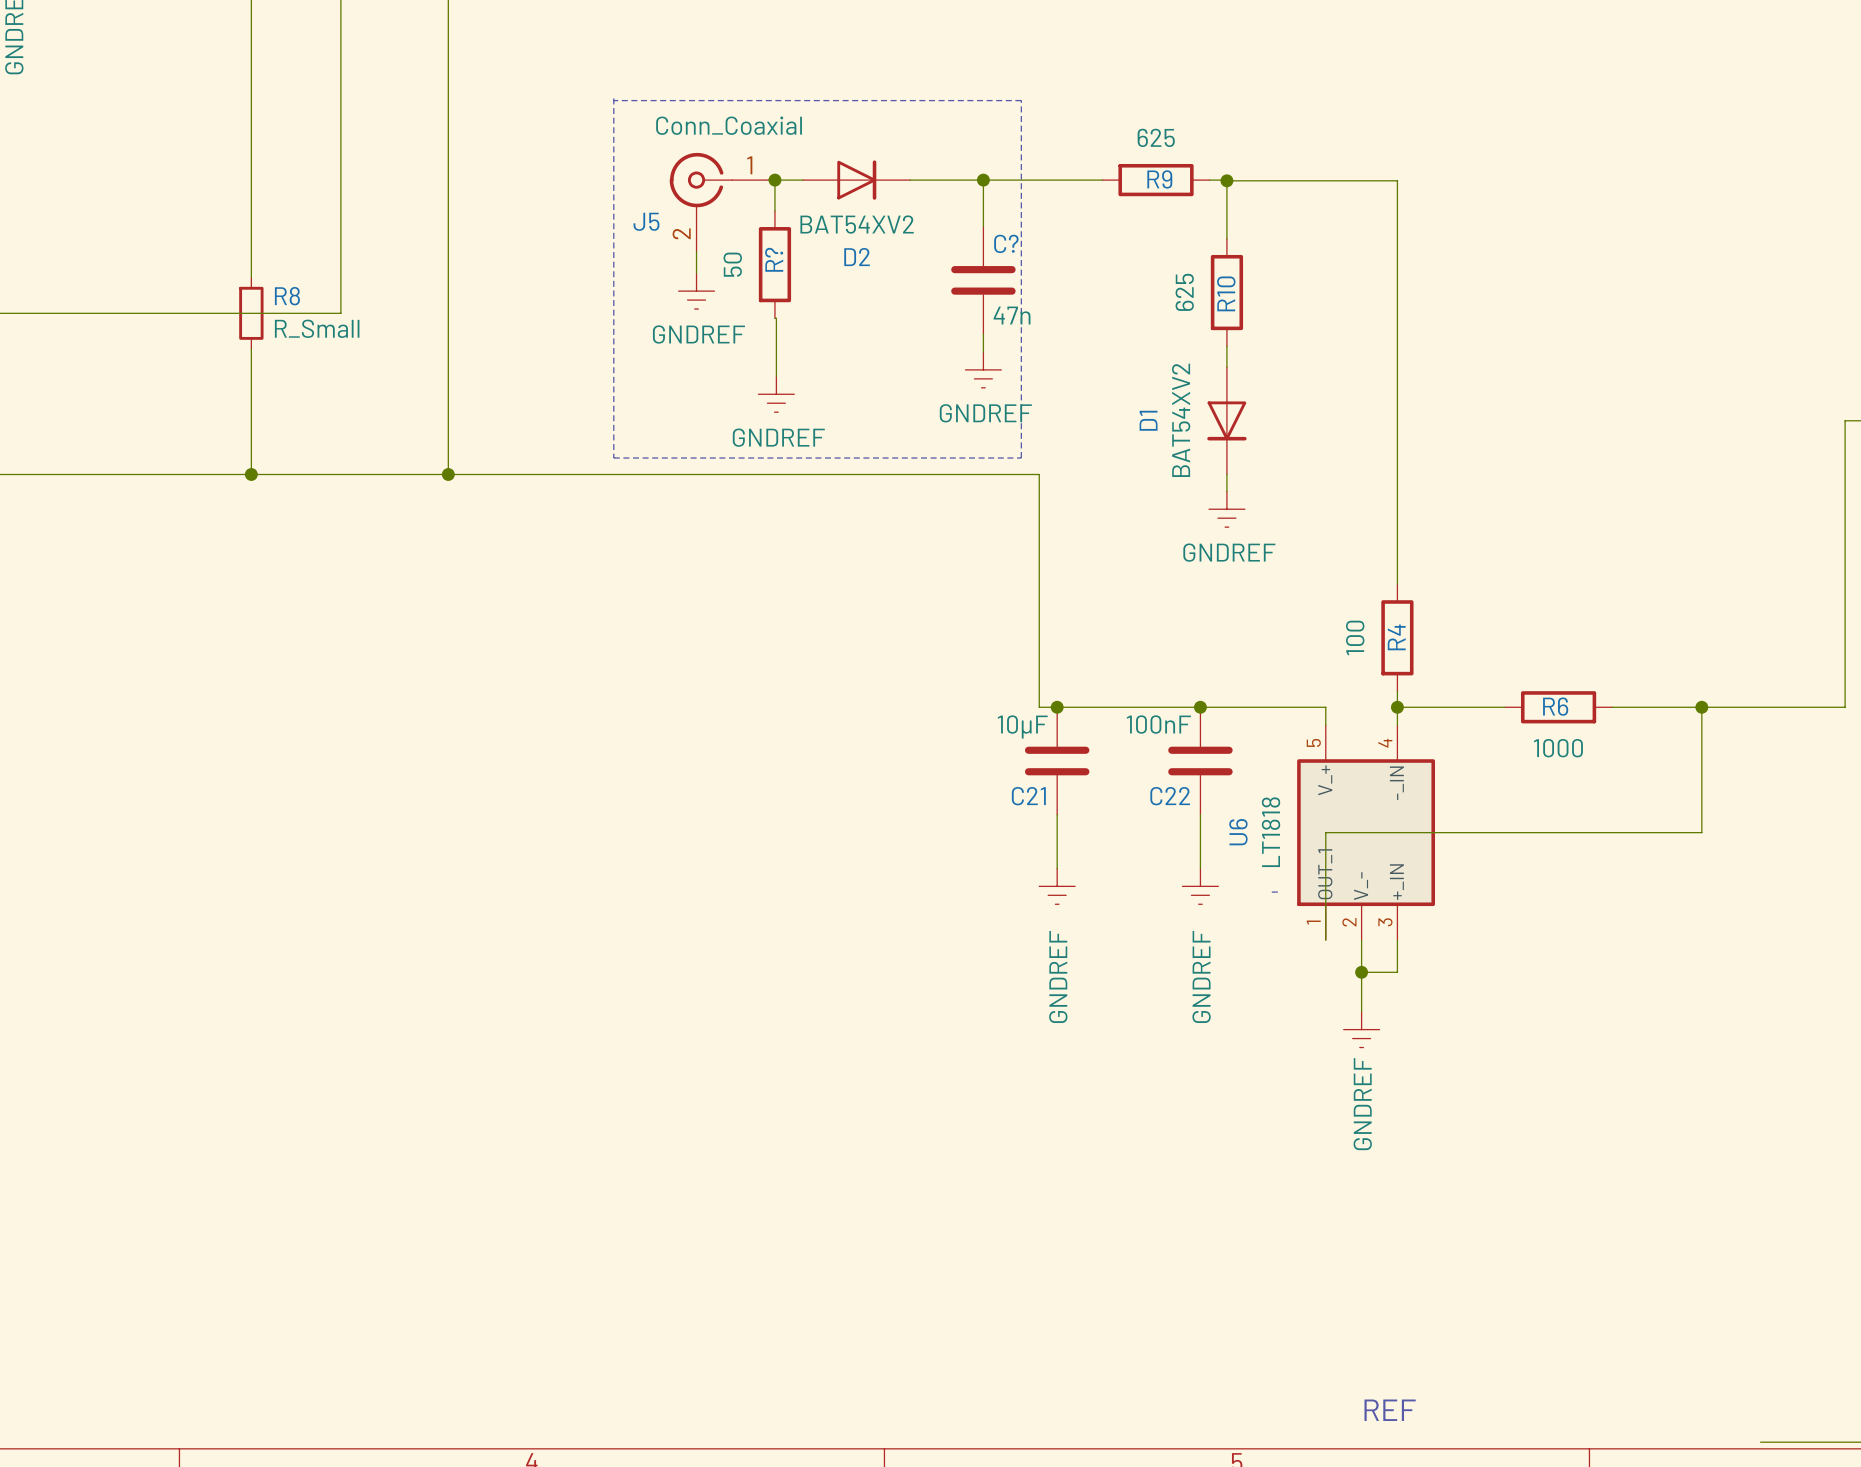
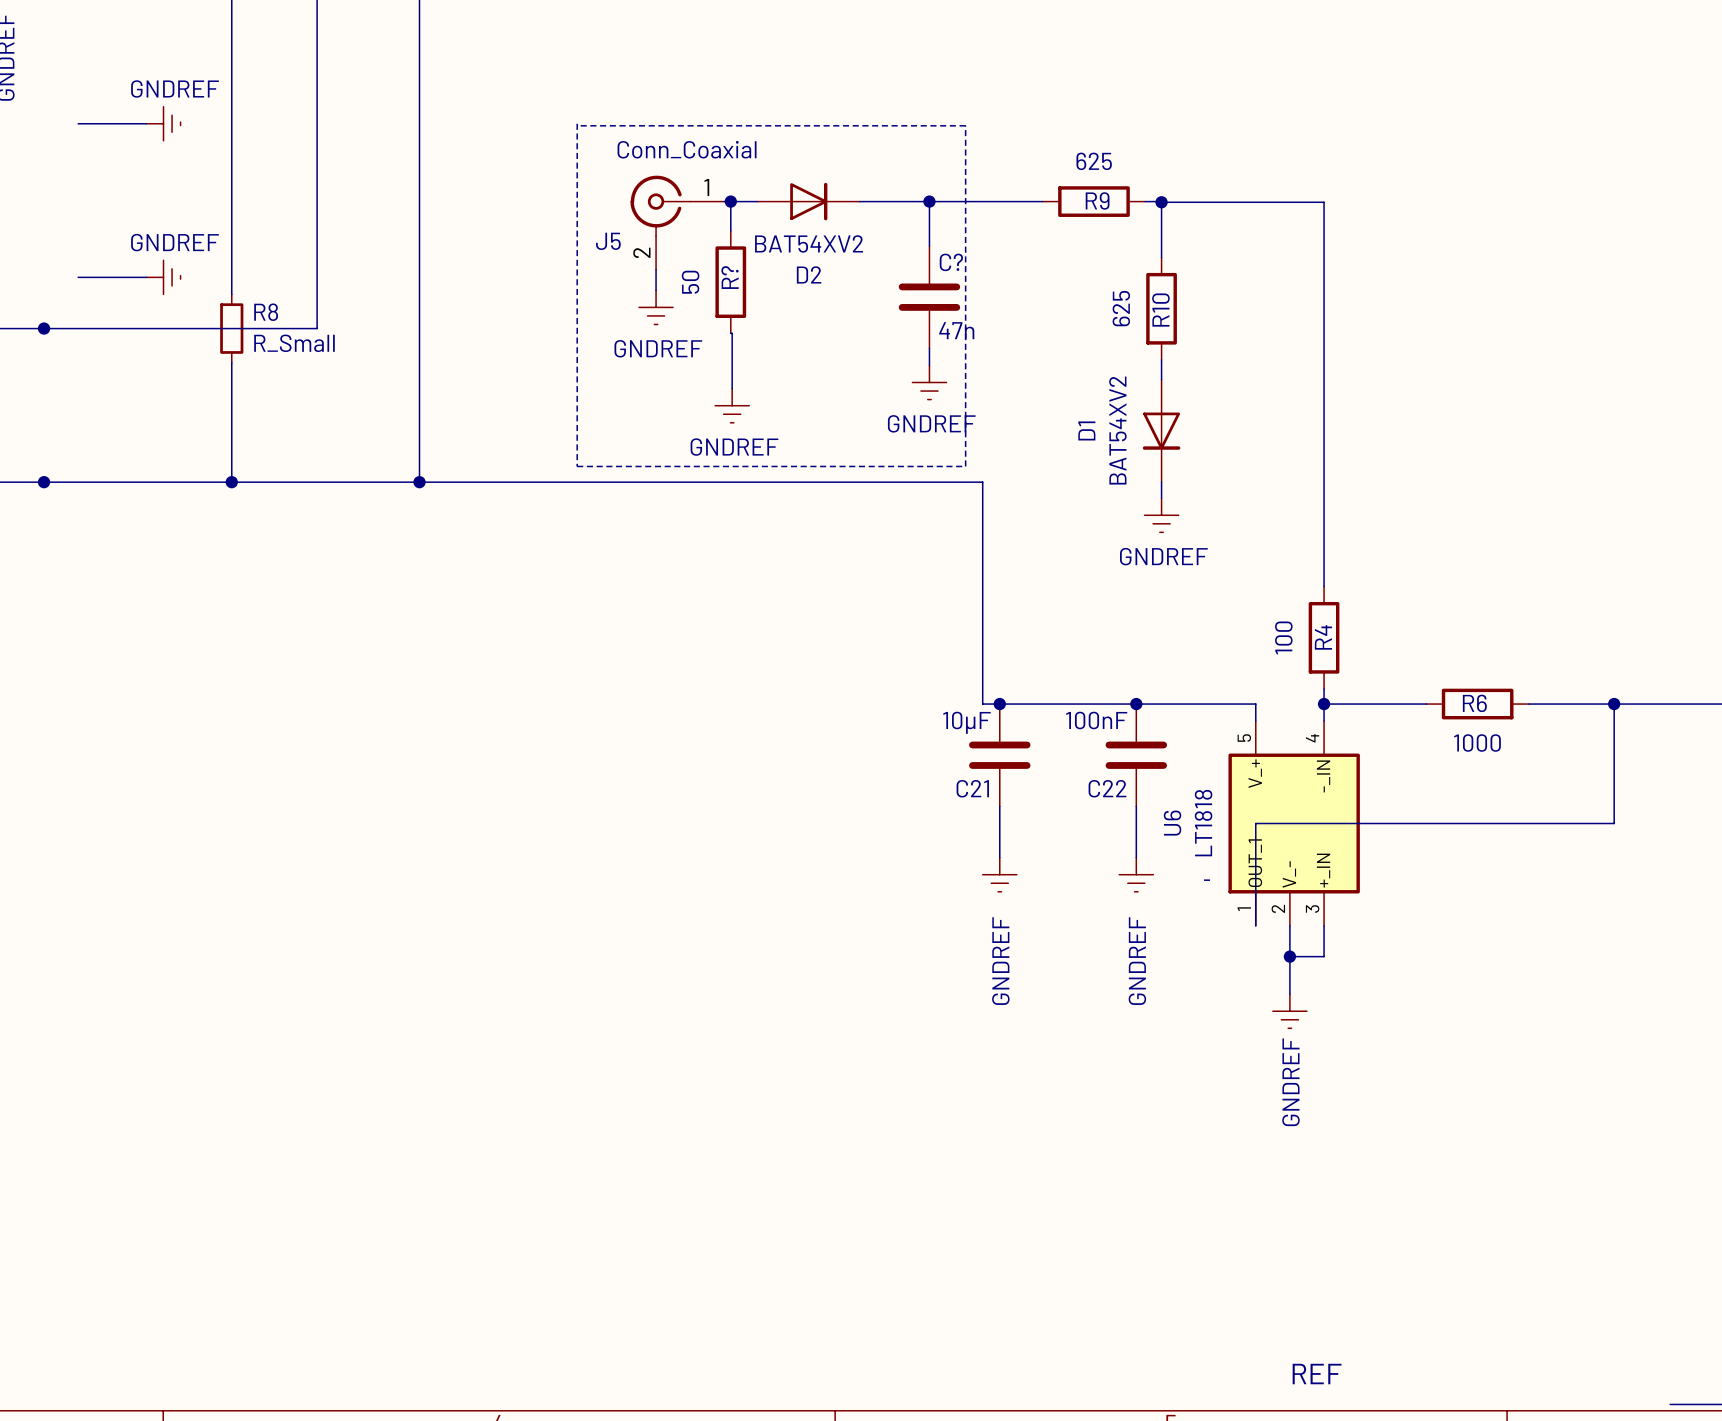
wire: none -> (78, 123) (146, 123)
power symbol: none -> GNDREF (163, 123)
wire: none -> (78, 277) (146, 277)
power symbol: none -> GNDREF (163, 277)
junction: none -> (44, 328)
junction: none -> (44, 482)

